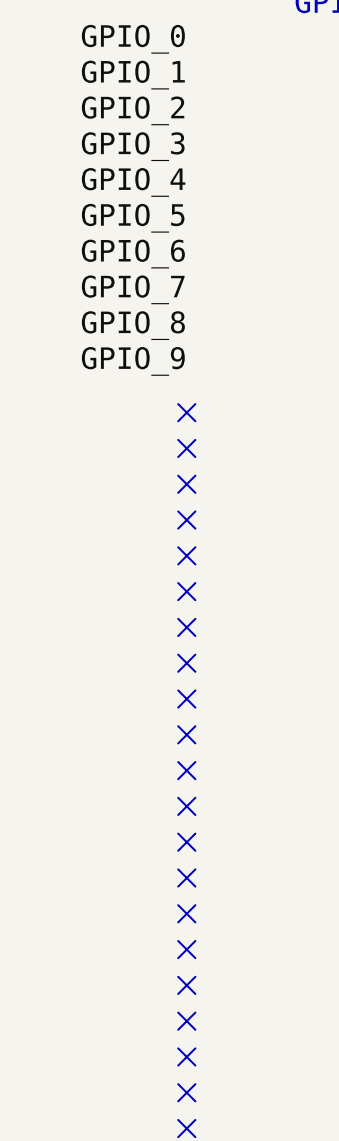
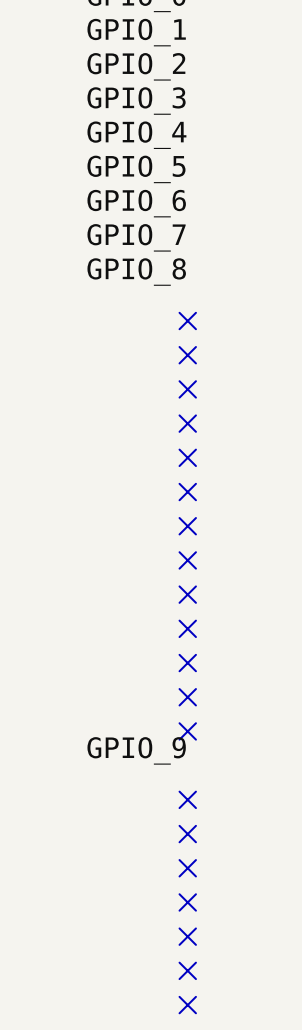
label: GPIO_9 (133, 361) -> none
no-connect mark: none -> (187, 321)
label: none -> GPIO_9 (136, 750)
no-connect mark: (186, 842) -> none

